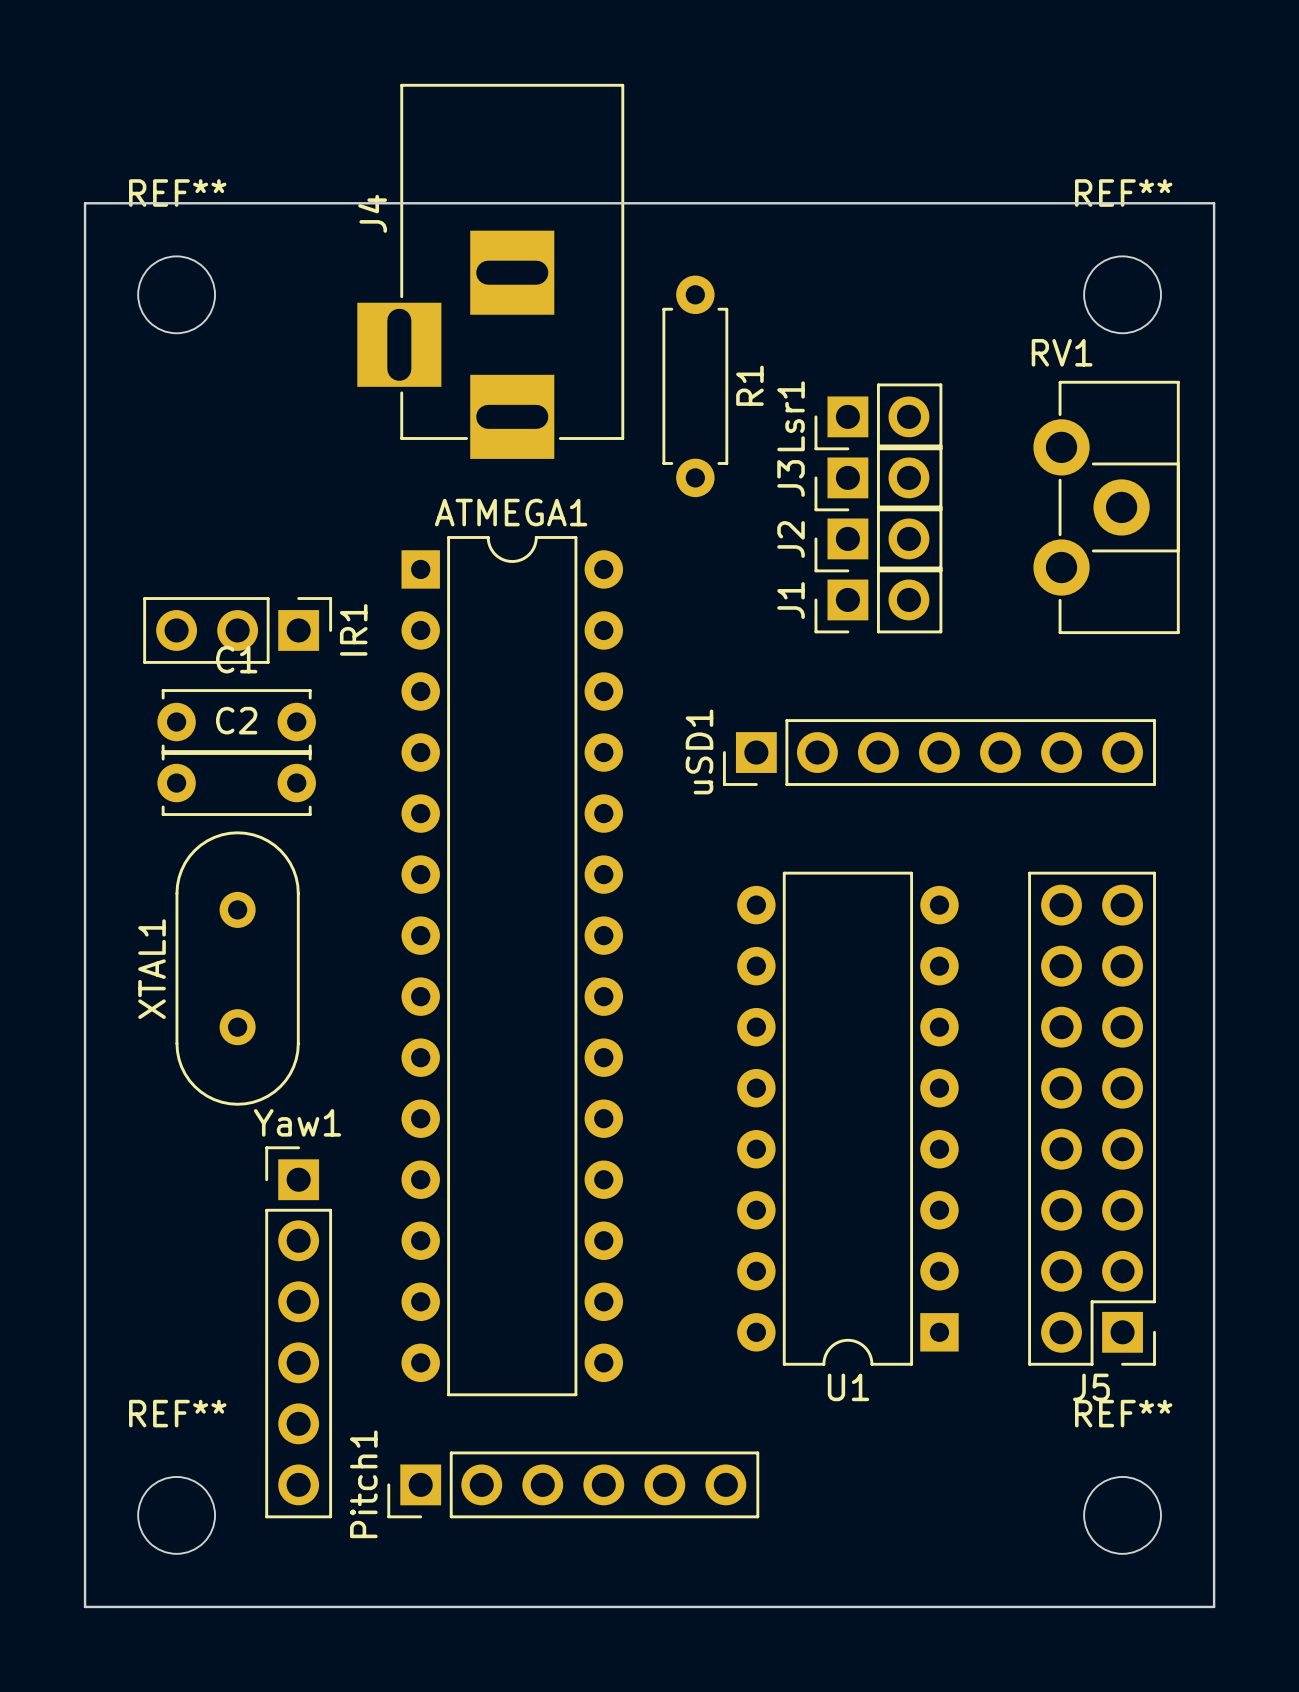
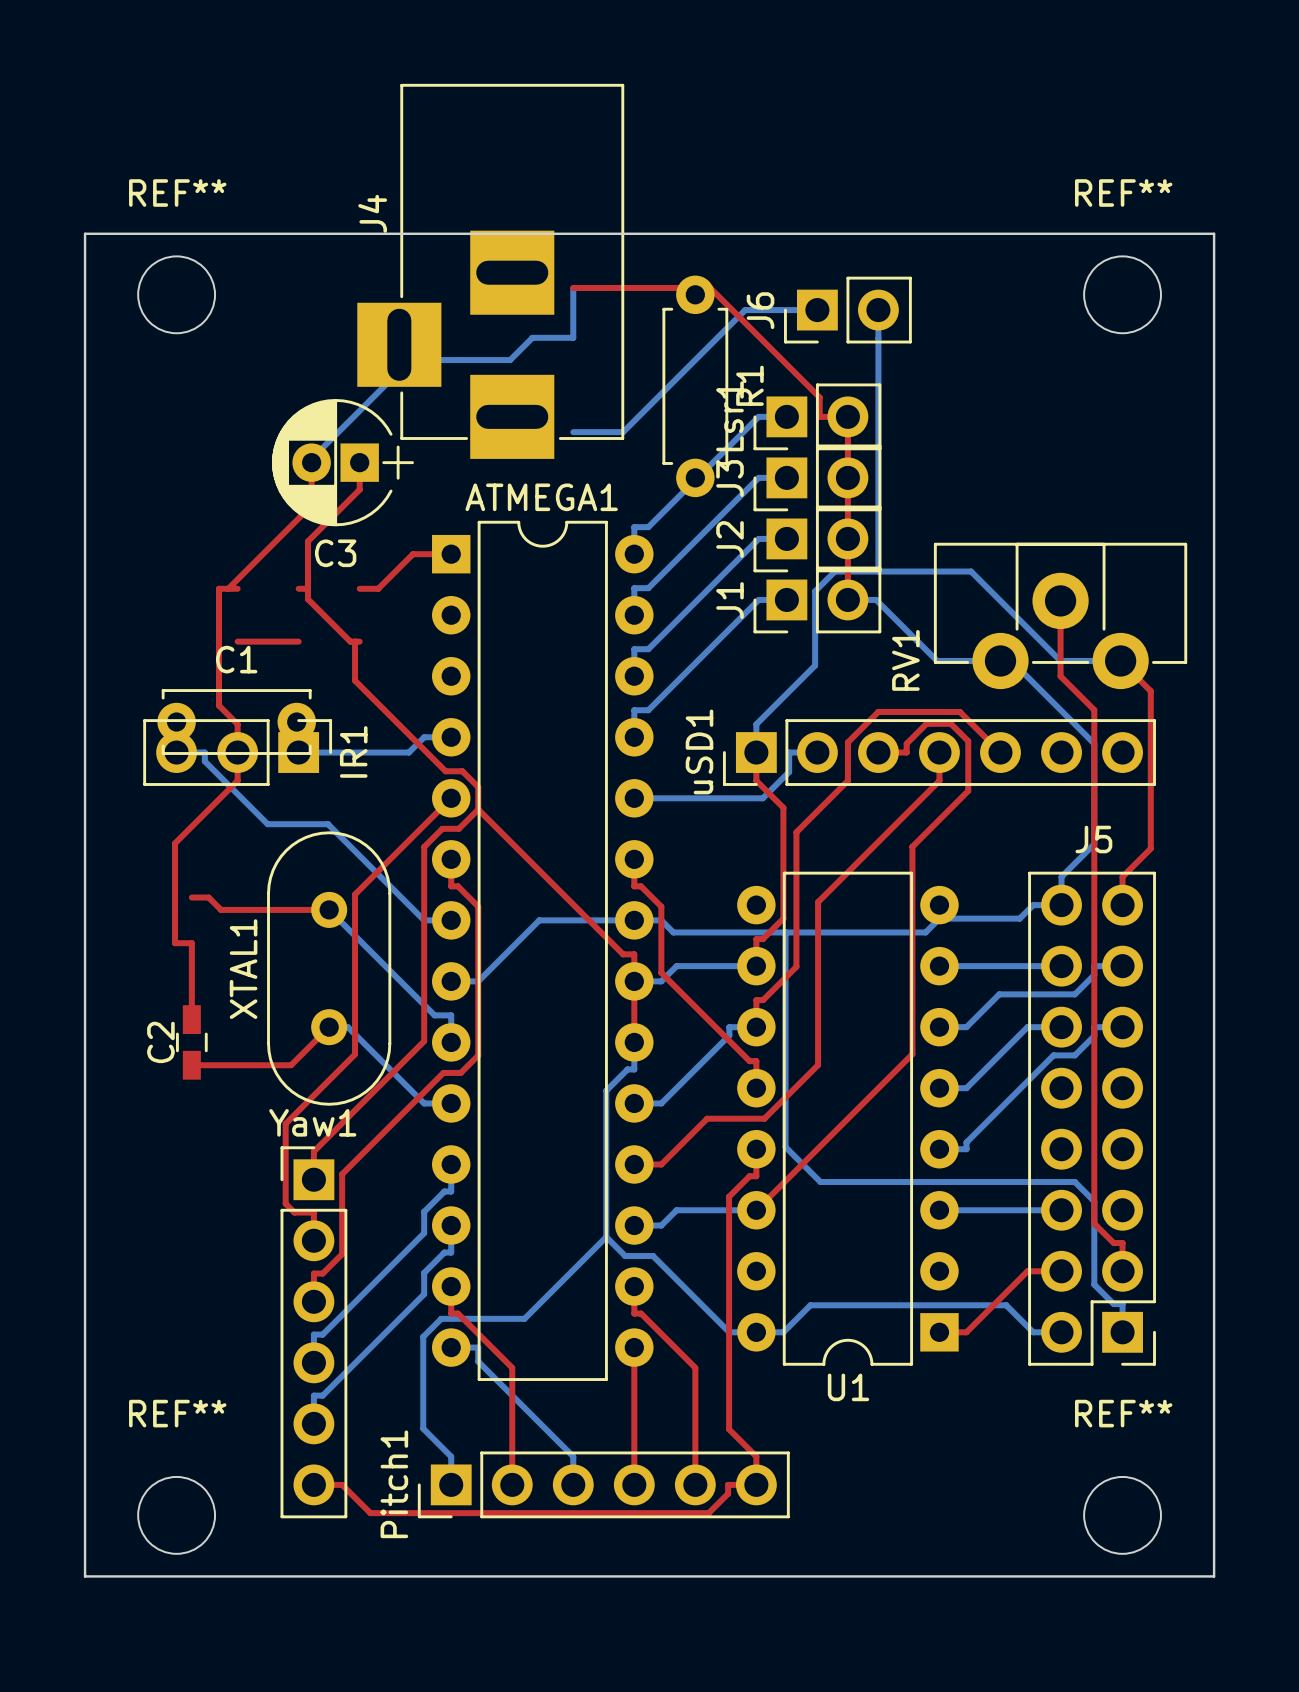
board edge: (85, 233) (85, 203) (1214, 203) (1214, 233) -> (85, 233) (1214, 233)
top track: none -> (573, 287) (710, 287) (819, 397) (819, 416) (847, 416) (847, 599)
bottom track: none -> (573, 287) (573, 337) (532, 337) (510, 360) (410, 360) (311, 458) (311, 462)
bottom track: none -> (817, 310) (745, 310) (623, 432) (573, 432)
J6: none -> (847, 310)
bottom track: none -> (878, 310) (878, 571)
bottom track: none -> (786, 416) (758, 416) (648, 527) (634, 527) (634, 554)
Lsr1 position: (878, 416) -> (817, 416)
top track: none -> (311, 462) (311, 505) (228, 588)
C3: none -> (342, 462)
top track: none -> (359, 462) (359, 489) (307, 541) (307, 599) (350, 641) (359, 641)
bottom track: none -> (786, 477) (758, 477) (648, 588) (634, 588) (634, 615)
J3 position: (878, 477) -> (817, 477)
RV1 rotation: 0° (1106, 507) -> 90° counterclockwise (1060, 615)
bottom track: none -> (786, 538) (758, 538) (648, 649) (634, 649) (634, 676)
J2 position: (878, 538) -> (817, 538)
top track: none -> (451, 554) (412, 554) (378, 588) (359, 588)
top track: none -> (237, 588) (219, 588) (219, 705) (237, 724) (237, 780) (175, 843) (175, 943) (191, 943) (191, 1019)
top track: none -> (298, 588) (307, 588)
bottom track: none -> (786, 599) (758, 599) (648, 710) (634, 710) (634, 737)
bottom track: none -> (847, 599) (876, 599) (937, 660) (1011, 660) (1094, 743) (1094, 844) (1061, 876) (1061, 905) (1033, 905) (1019, 918) (939, 918)
J1 position: (878, 599) -> (817, 599)
top track: none -> (1060, 600) (1060, 676) (1094, 710) (1094, 1223) (1113, 1243) (1122, 1243) (1122, 1271)
IR1 position: (237, 630) -> (237, 752)
top track: none -> (237, 641) (298, 641)
top track: none -> (355, 641) (355, 680) (445, 771) (462, 771) (478, 787) (478, 809)
top track: none -> (1120, 660) (1150, 691) (1150, 848) (1122, 876) (1122, 905)
bottom track: none -> (1120, 660) (1060, 660) (971, 571) (834, 571) (815, 591) (815, 665) (756, 724) (756, 752)
C2 name position: C2 (236, 720) -> C2 (160, 1042)
bottom track: none -> (451, 737) (424, 737) (408, 752) (298, 752)
C2 footprint: [157, 750, 316, 816] -> [176, 1005, 208, 1080]
bottom track: none -> (176, 752) (204, 752) (204, 761) (267, 824) (328, 824) (424, 920) (451, 920)
top track: none -> (756, 752) (756, 780) (783, 807) (783, 918) (762, 939) (756, 939) (756, 966)
bottom track: none -> (817, 752) (789, 752) (789, 771) (762, 798) (634, 798)
top track: none -> (878, 752) (906, 752) (906, 743) (926, 723) (950, 723) (968, 741) (968, 790) (912, 846) (912, 1054) (756, 1210)
top track: none -> (939, 752) (939, 780) (818, 902) (818, 1065) (764, 1118) (707, 1118) (661, 1164) (634, 1164)
top track: none -> (1000, 752) (959, 711) (878, 711) (847, 742) (847, 780) (796, 832) (796, 966) (763, 1000) (756, 1000) (756, 1027)
top track: none -> (451, 798) (355, 894) (355, 1054) (285, 1123) (285, 1203) (294, 1212) (313, 1212) (313, 1240)
top track: none -> (478, 809) (623, 954) (634, 954) (634, 1042)
top track: none -> (478, 809) (458, 828) (442, 828) (424, 847) (424, 1041) (313, 1151) (313, 1179)
top track: none -> (451, 859) (451, 886) (457, 886) (478, 906) (478, 1055) (460, 1072) (443, 1072) (342, 1174) (342, 1254) (322, 1273) (313, 1273) (313, 1301)
top track: none -> (634, 859) (634, 886) (641, 886) (661, 906) (661, 972) (749, 1061) (756, 1061) (756, 1088)
top track: none -> (191, 897) (208, 897) (221, 909) (329, 909)
bottom track: none -> (329, 909) (434, 1015) (451, 1015) (451, 1042)
bottom track: none -> (939, 918) (925, 932) (673, 932) (661, 920) (539, 920) (478, 981) (451, 981)
bottom track: none -> (785, 932) (785, 1147) (820, 1182) (1074, 1182) (1094, 1201) (1094, 1284) (1113, 1304) (1122, 1304) (1122, 1332)
ATMEGA1 position: (512, 966) -> (542, 950)
bottom track: none -> (756, 966) (676, 966) (661, 981) (634, 981)
bottom track: none -> (939, 966) (1061, 966)
bottom track: none -> (1122, 966) (1094, 966) (1094, 974) (1074, 994) (999, 994) (966, 1027) (939, 1027)
XTAL1 position: (237, 968) -> (329, 968)
top track: none -> (329, 1027) (291, 1065) (191, 1065)
bottom track: none -> (329, 1027) (347, 1027) (424, 1103) (451, 1103)
bottom track: none -> (756, 1027) (729, 1027) (729, 1035) (661, 1103) (634, 1103)
bottom track: none -> (1061, 1027) (1027, 1027) (966, 1088) (939, 1088)
bottom track: none -> (1122, 1027) (1094, 1027) (1094, 1035) (1074, 1055) (1053, 1055) (966, 1142) (966, 1149) (939, 1149)
bottom track: none -> (634, 1042) (634, 1069) (627, 1069) (606, 1090) (606, 1237)
top track: none -> (756, 1149) (756, 1176) (749, 1176) (729, 1196) (729, 1429) (756, 1456) (756, 1484) (728, 1484) (728, 1493) (708, 1513) (370, 1513) (342, 1484) (313, 1484)
bottom track: none -> (451, 1164) (451, 1191) (444, 1191) (424, 1211) (424, 1233) (322, 1334) (313, 1334) (313, 1362)
bottom track: none -> (756, 1210) (676, 1210) (661, 1225) (634, 1225)
bottom track: none -> (939, 1210) (1061, 1210)
bottom track: none -> (451, 1225) (451, 1252) (444, 1252) (424, 1272) (424, 1294) (322, 1395) (313, 1395) (313, 1423)
bottom track: none -> (606, 1237) (524, 1318) (441, 1318) (423, 1336) (423, 1428) (451, 1456) (451, 1484)
bottom track: none -> (606, 1237) (625, 1256) (653, 1256) (729, 1332) (783, 1332) (810, 1305) (1006, 1305) (1033, 1332) (1061, 1332)
top track: none -> (1061, 1271) (1027, 1271) (966, 1332) (939, 1332)
top track: none -> (451, 1286) (451, 1313) (457, 1313) (512, 1367) (512, 1484)
top track: none -> (634, 1286) (634, 1313) (641, 1313) (695, 1367) (695, 1484)
Yaw1 position: (298, 1332) -> (313, 1332)
bottom track: none -> (451, 1347) (478, 1347) (478, 1361) (573, 1456) (573, 1484)
top track: none -> (634, 1347) (634, 1484)
J5 name position: J5 (1091, 1387) -> J5 (1093, 839)
Pitch1 position: (573, 1484) -> (603, 1484)
board edge: (85, 1576) (85, 1606) (1214, 1606) (1214, 1576) -> (85, 1576) (1214, 1576)

